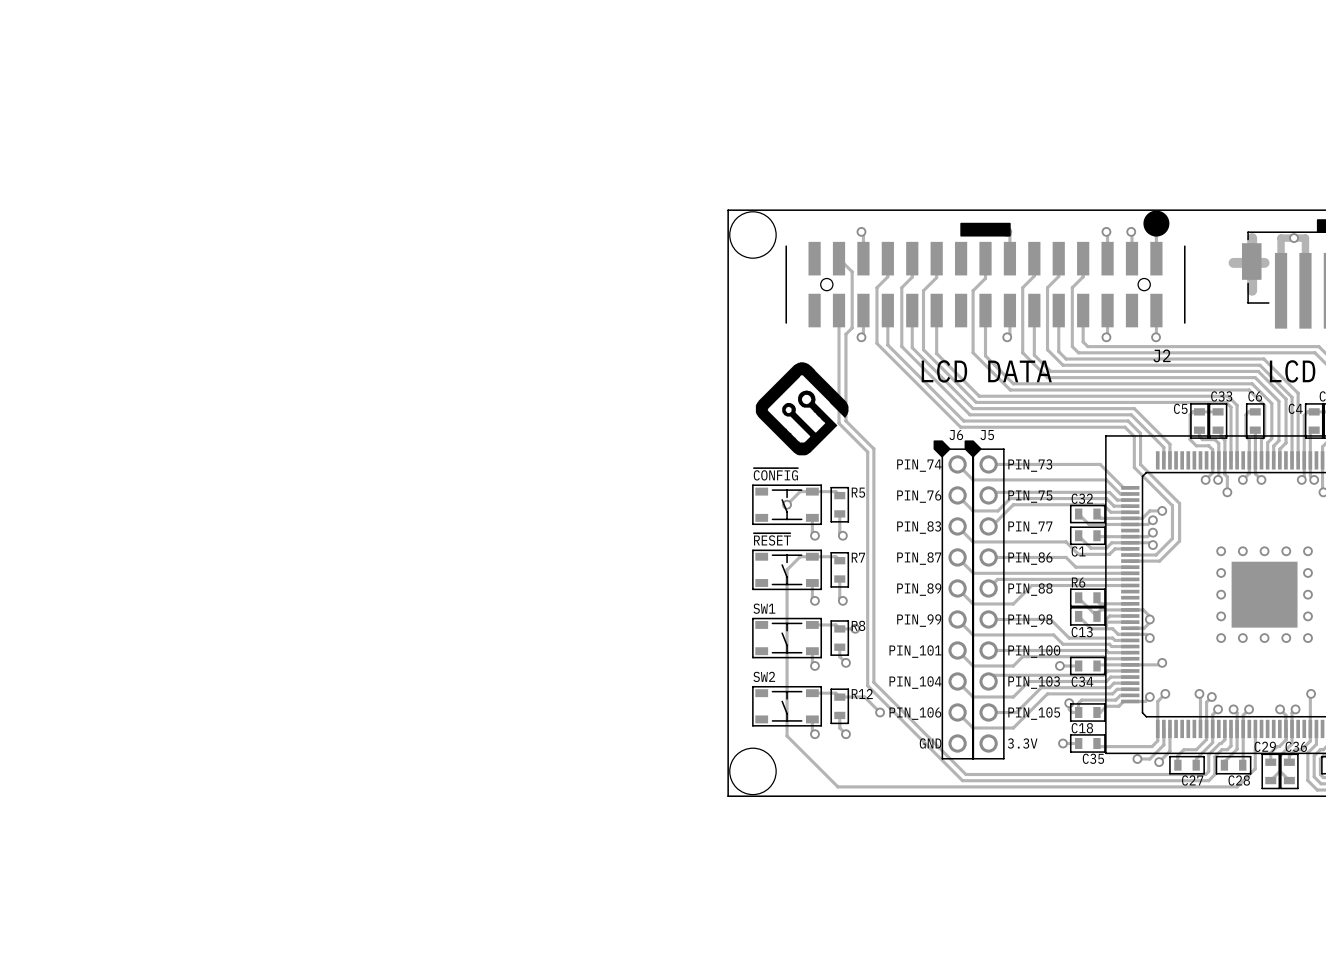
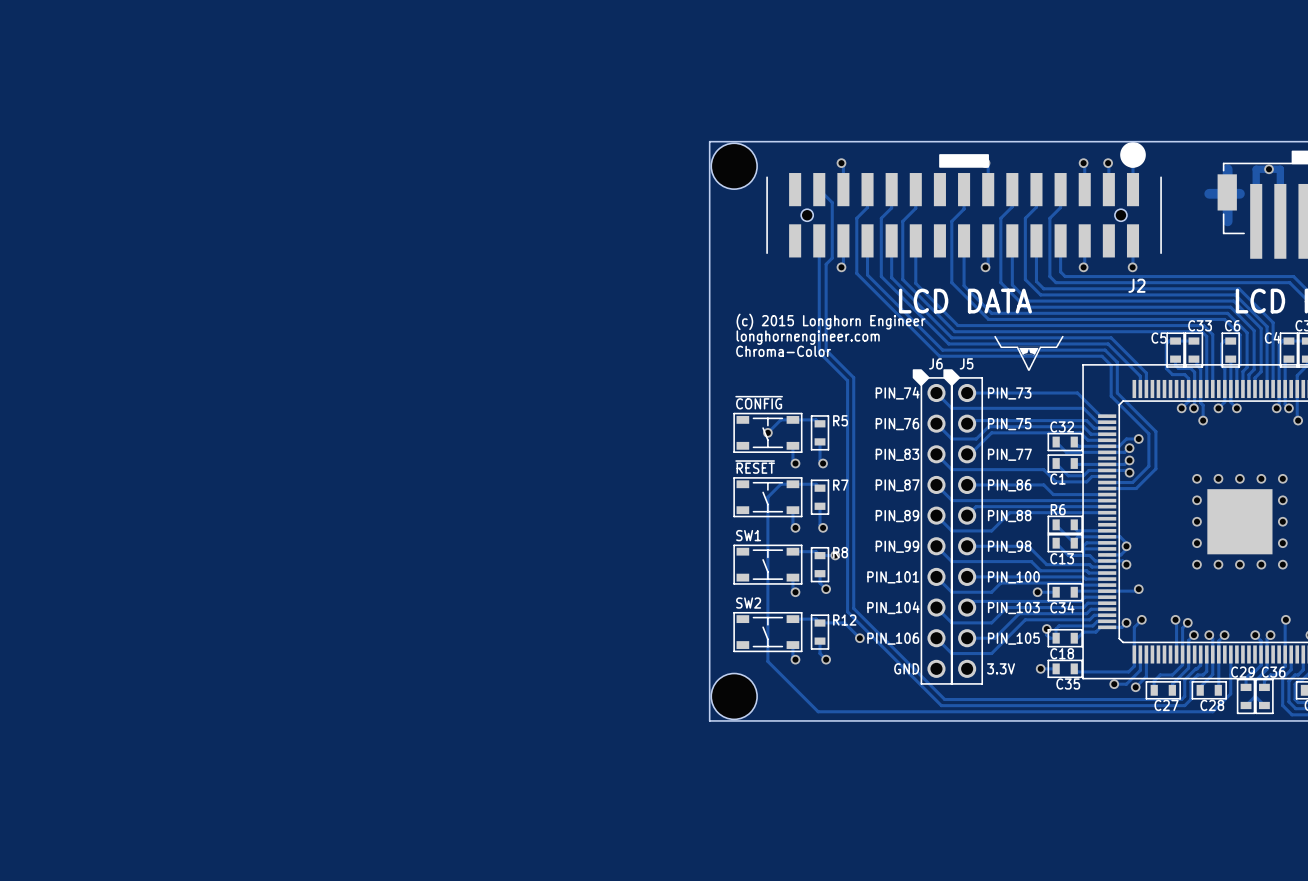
drawing: [755, 362, 849, 456] -> none
drawing: none -> [736, 313, 926, 358]
drawing: none -> [994, 335, 1064, 371]

